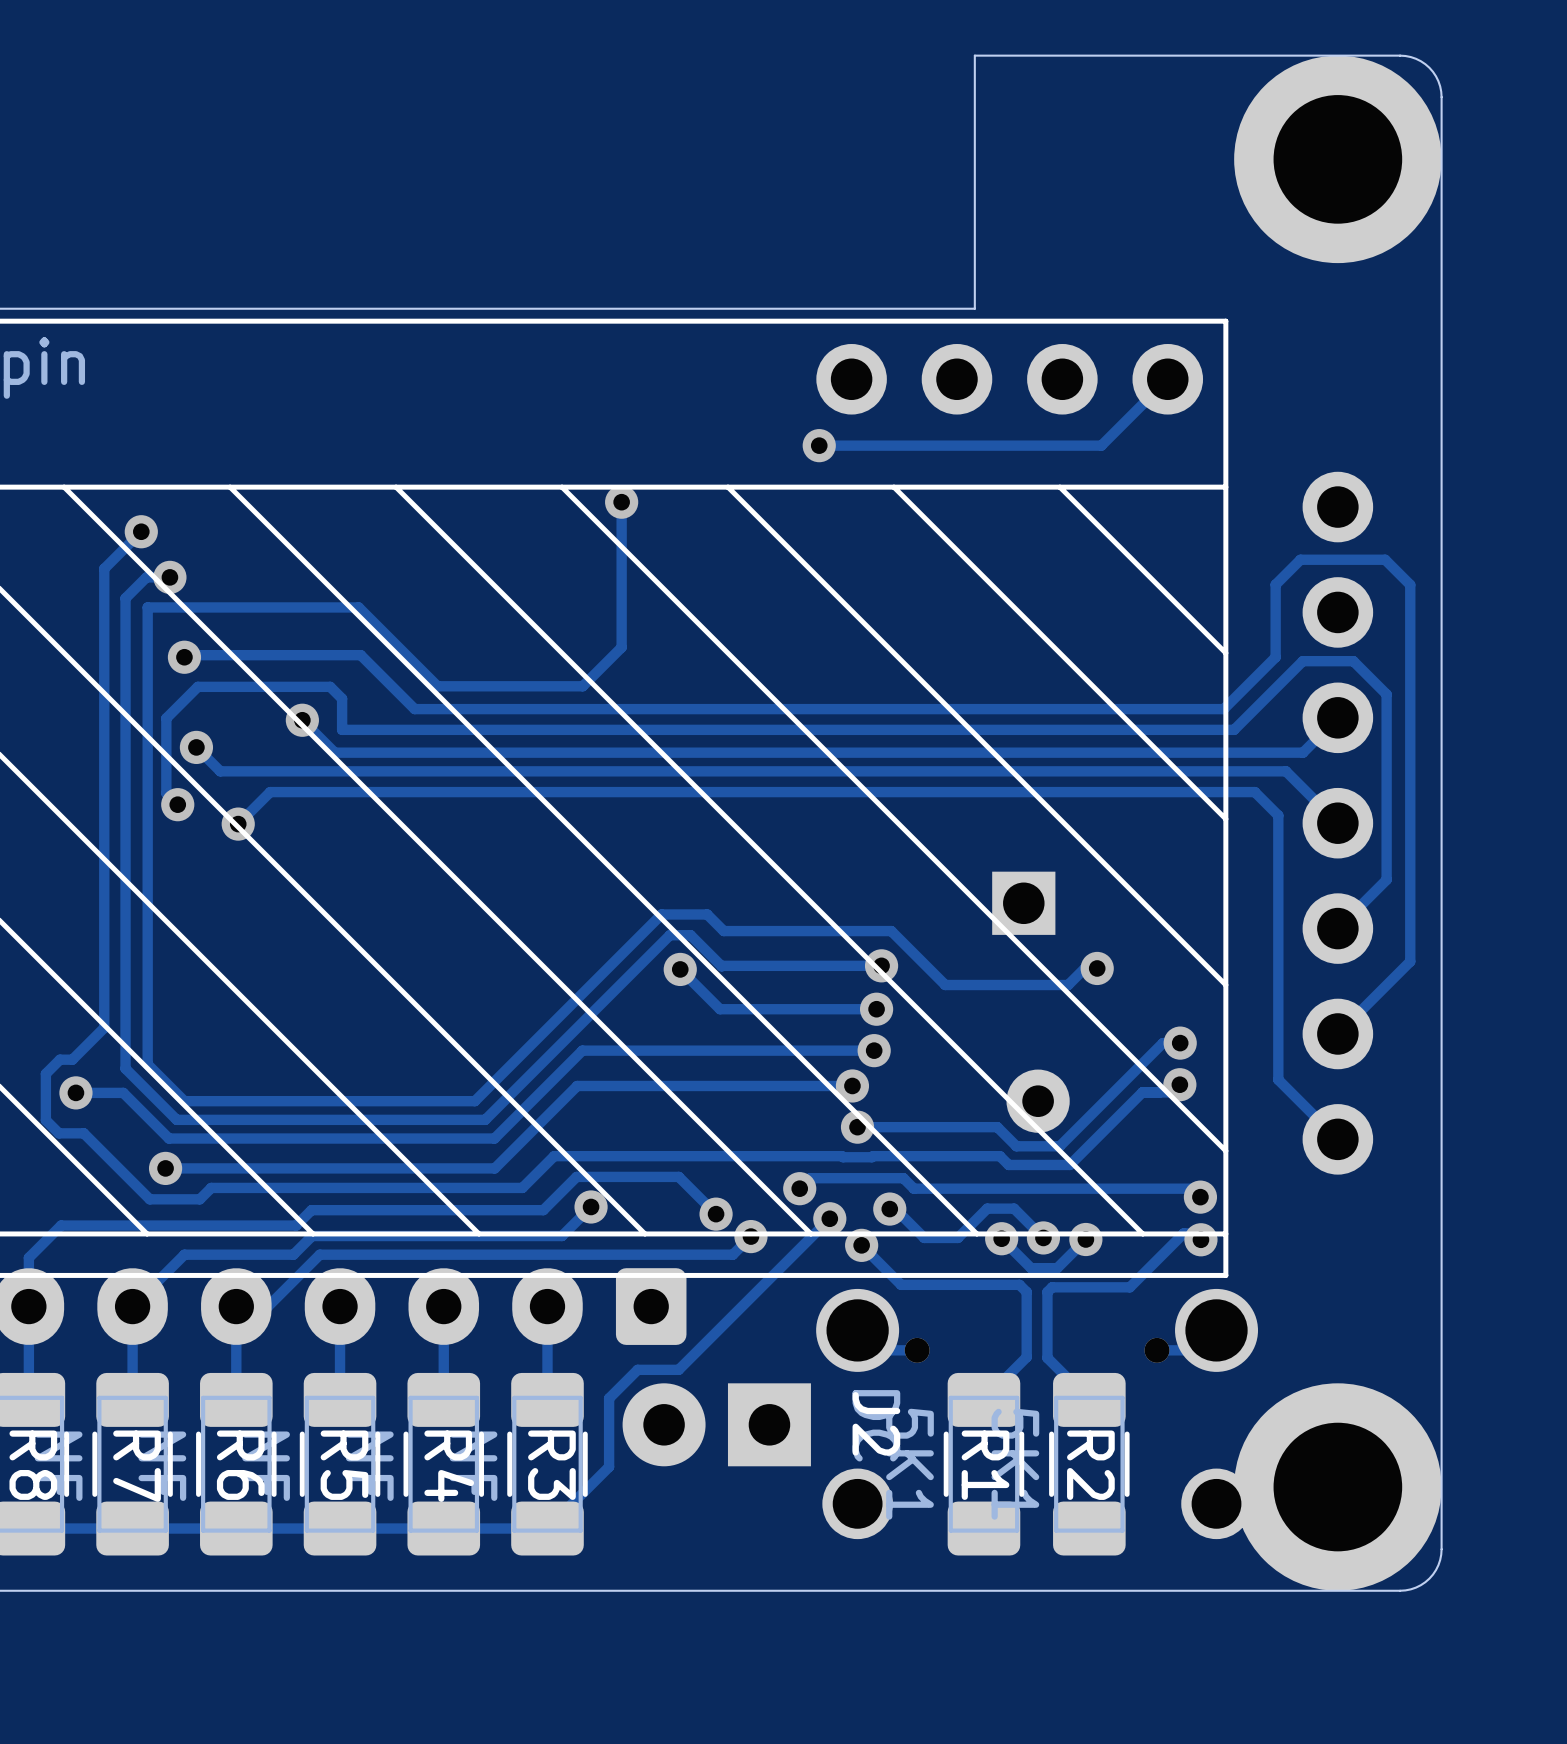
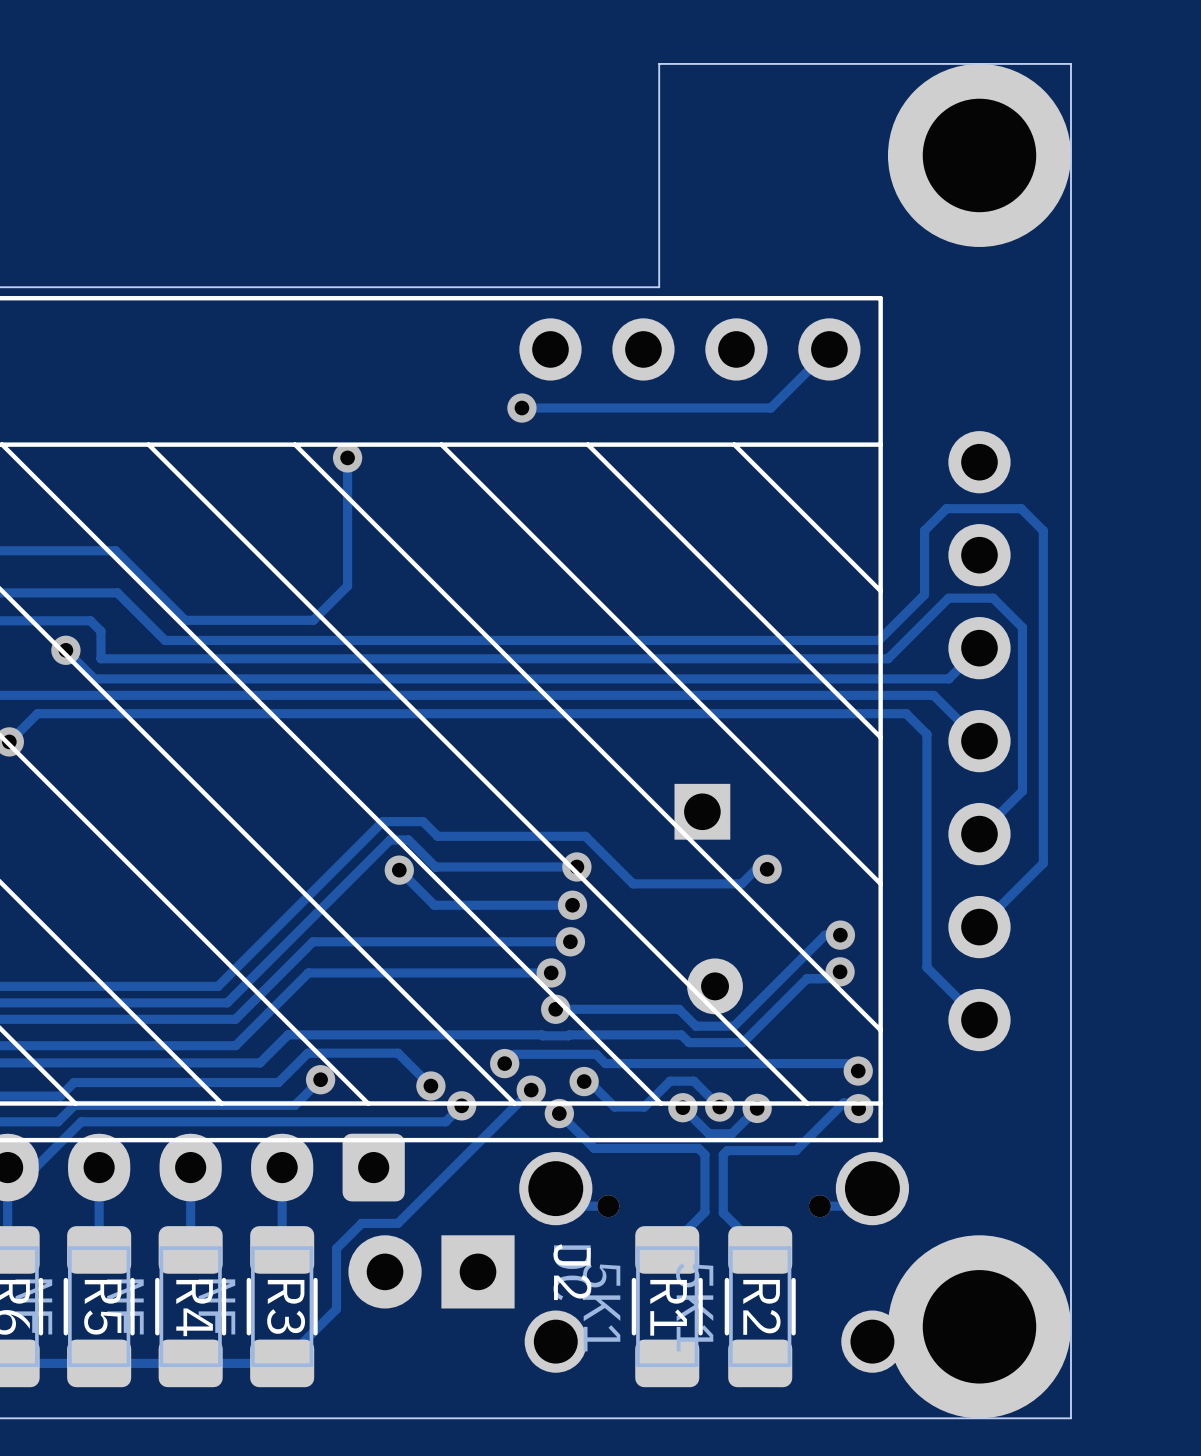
board edge: (1400, 55) (1415, 58) (1429, 67) (1438, 81) (1441, 97) -> (1034, 63) (1071, 63) (1071, 100)
board edge: (1441, 1549) (1438, 1565) (1429, 1578) (1415, 1587) (1400, 1590) -> (1071, 1381) (1071, 1418) (1034, 1418)

